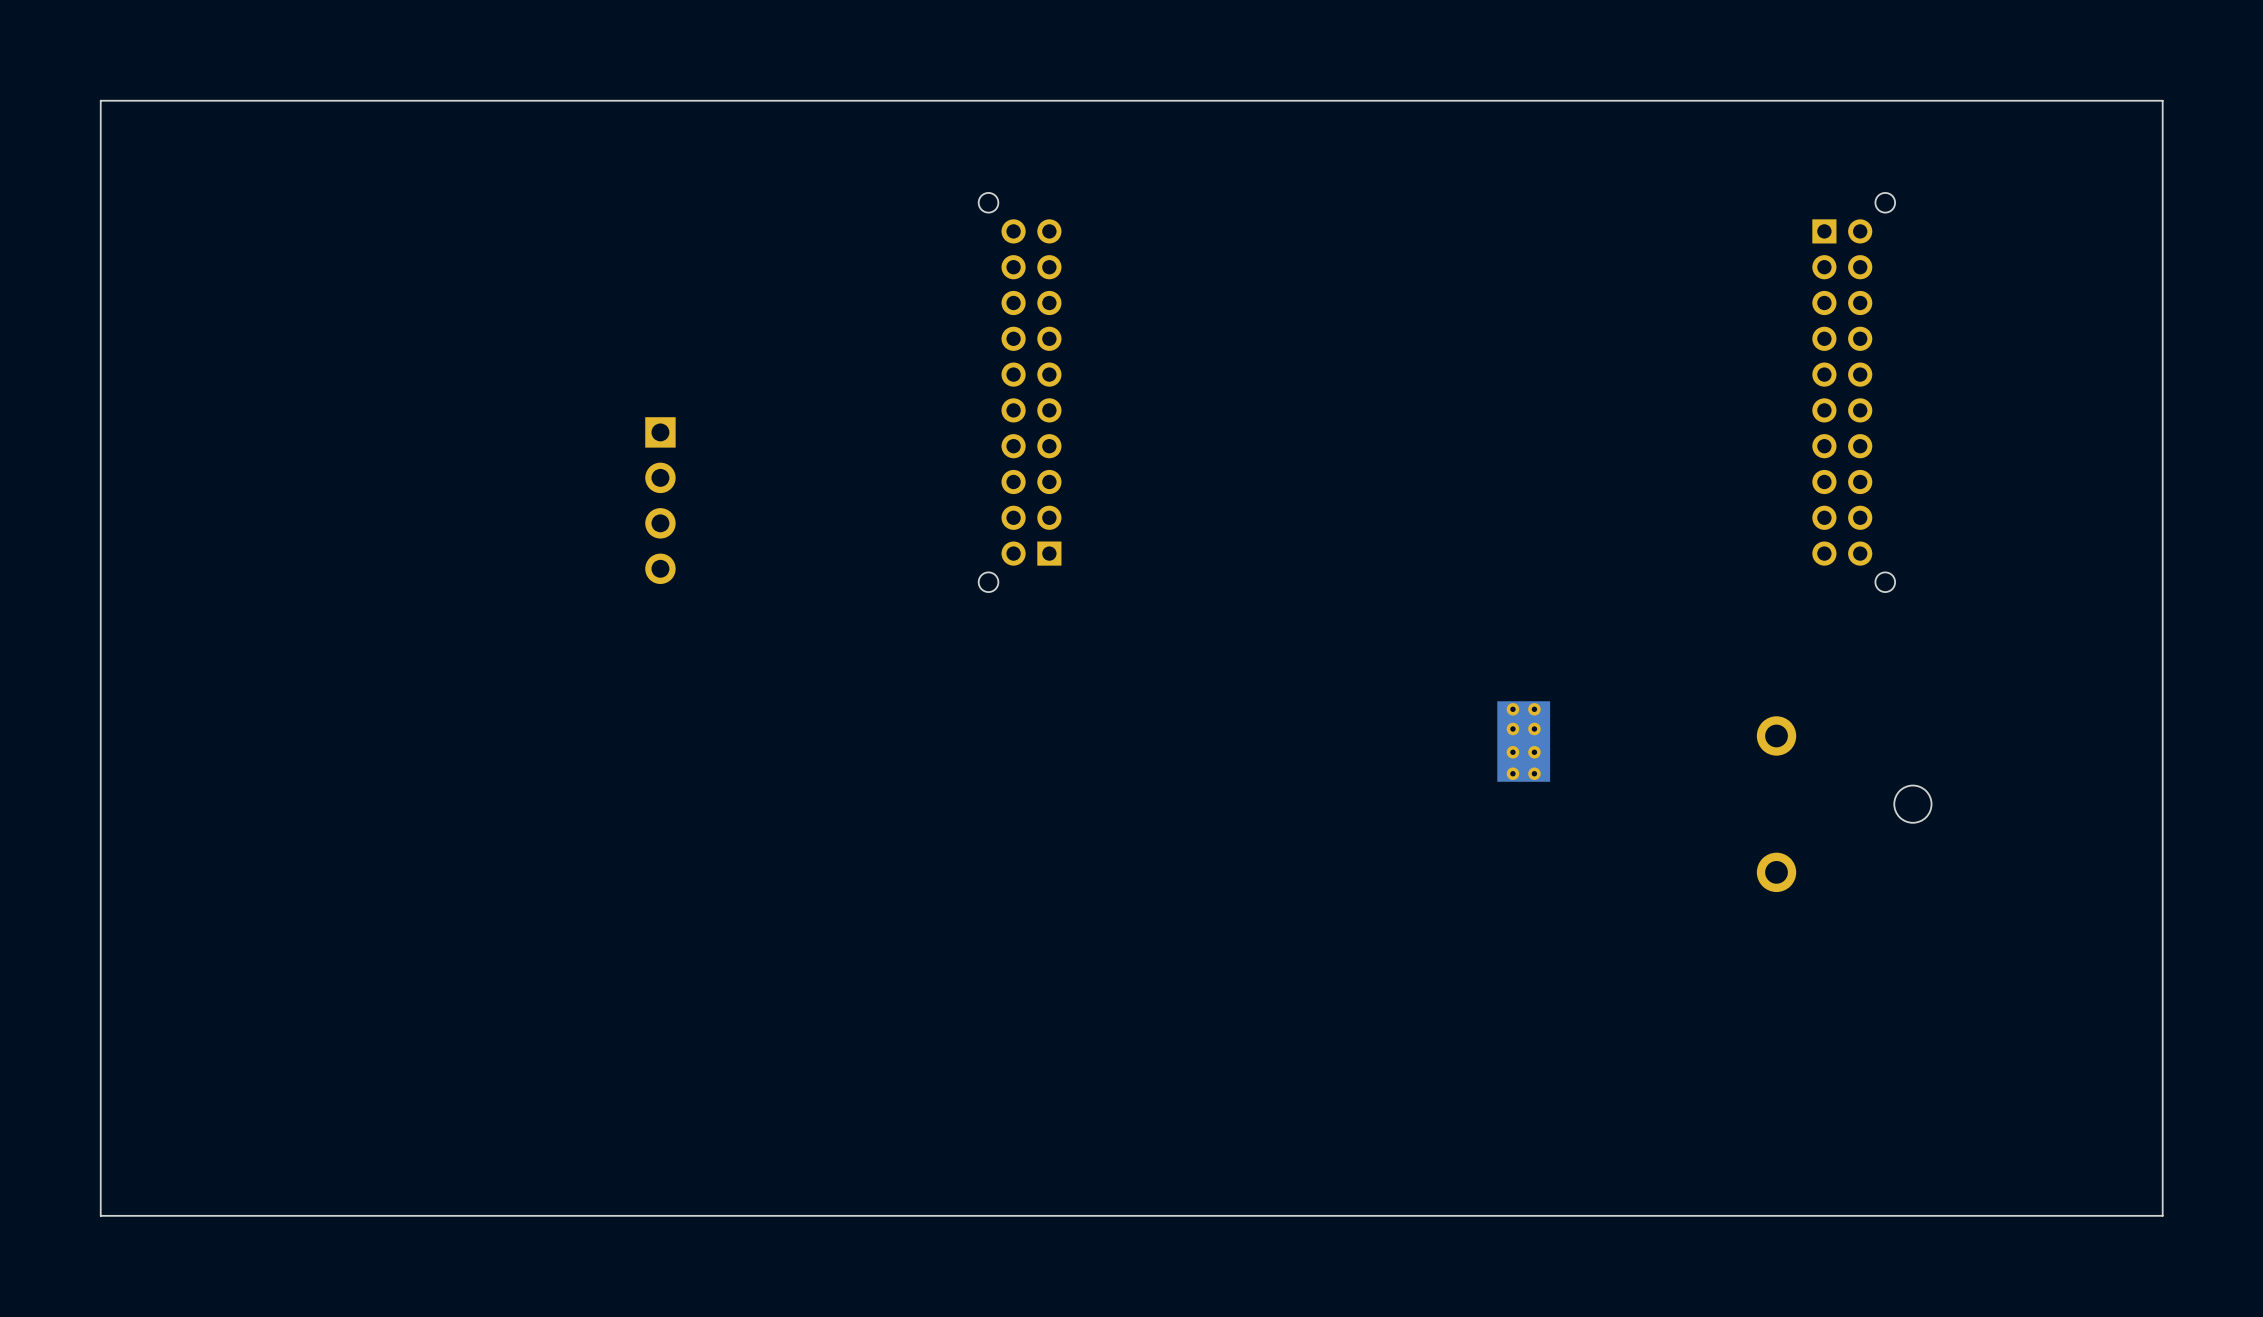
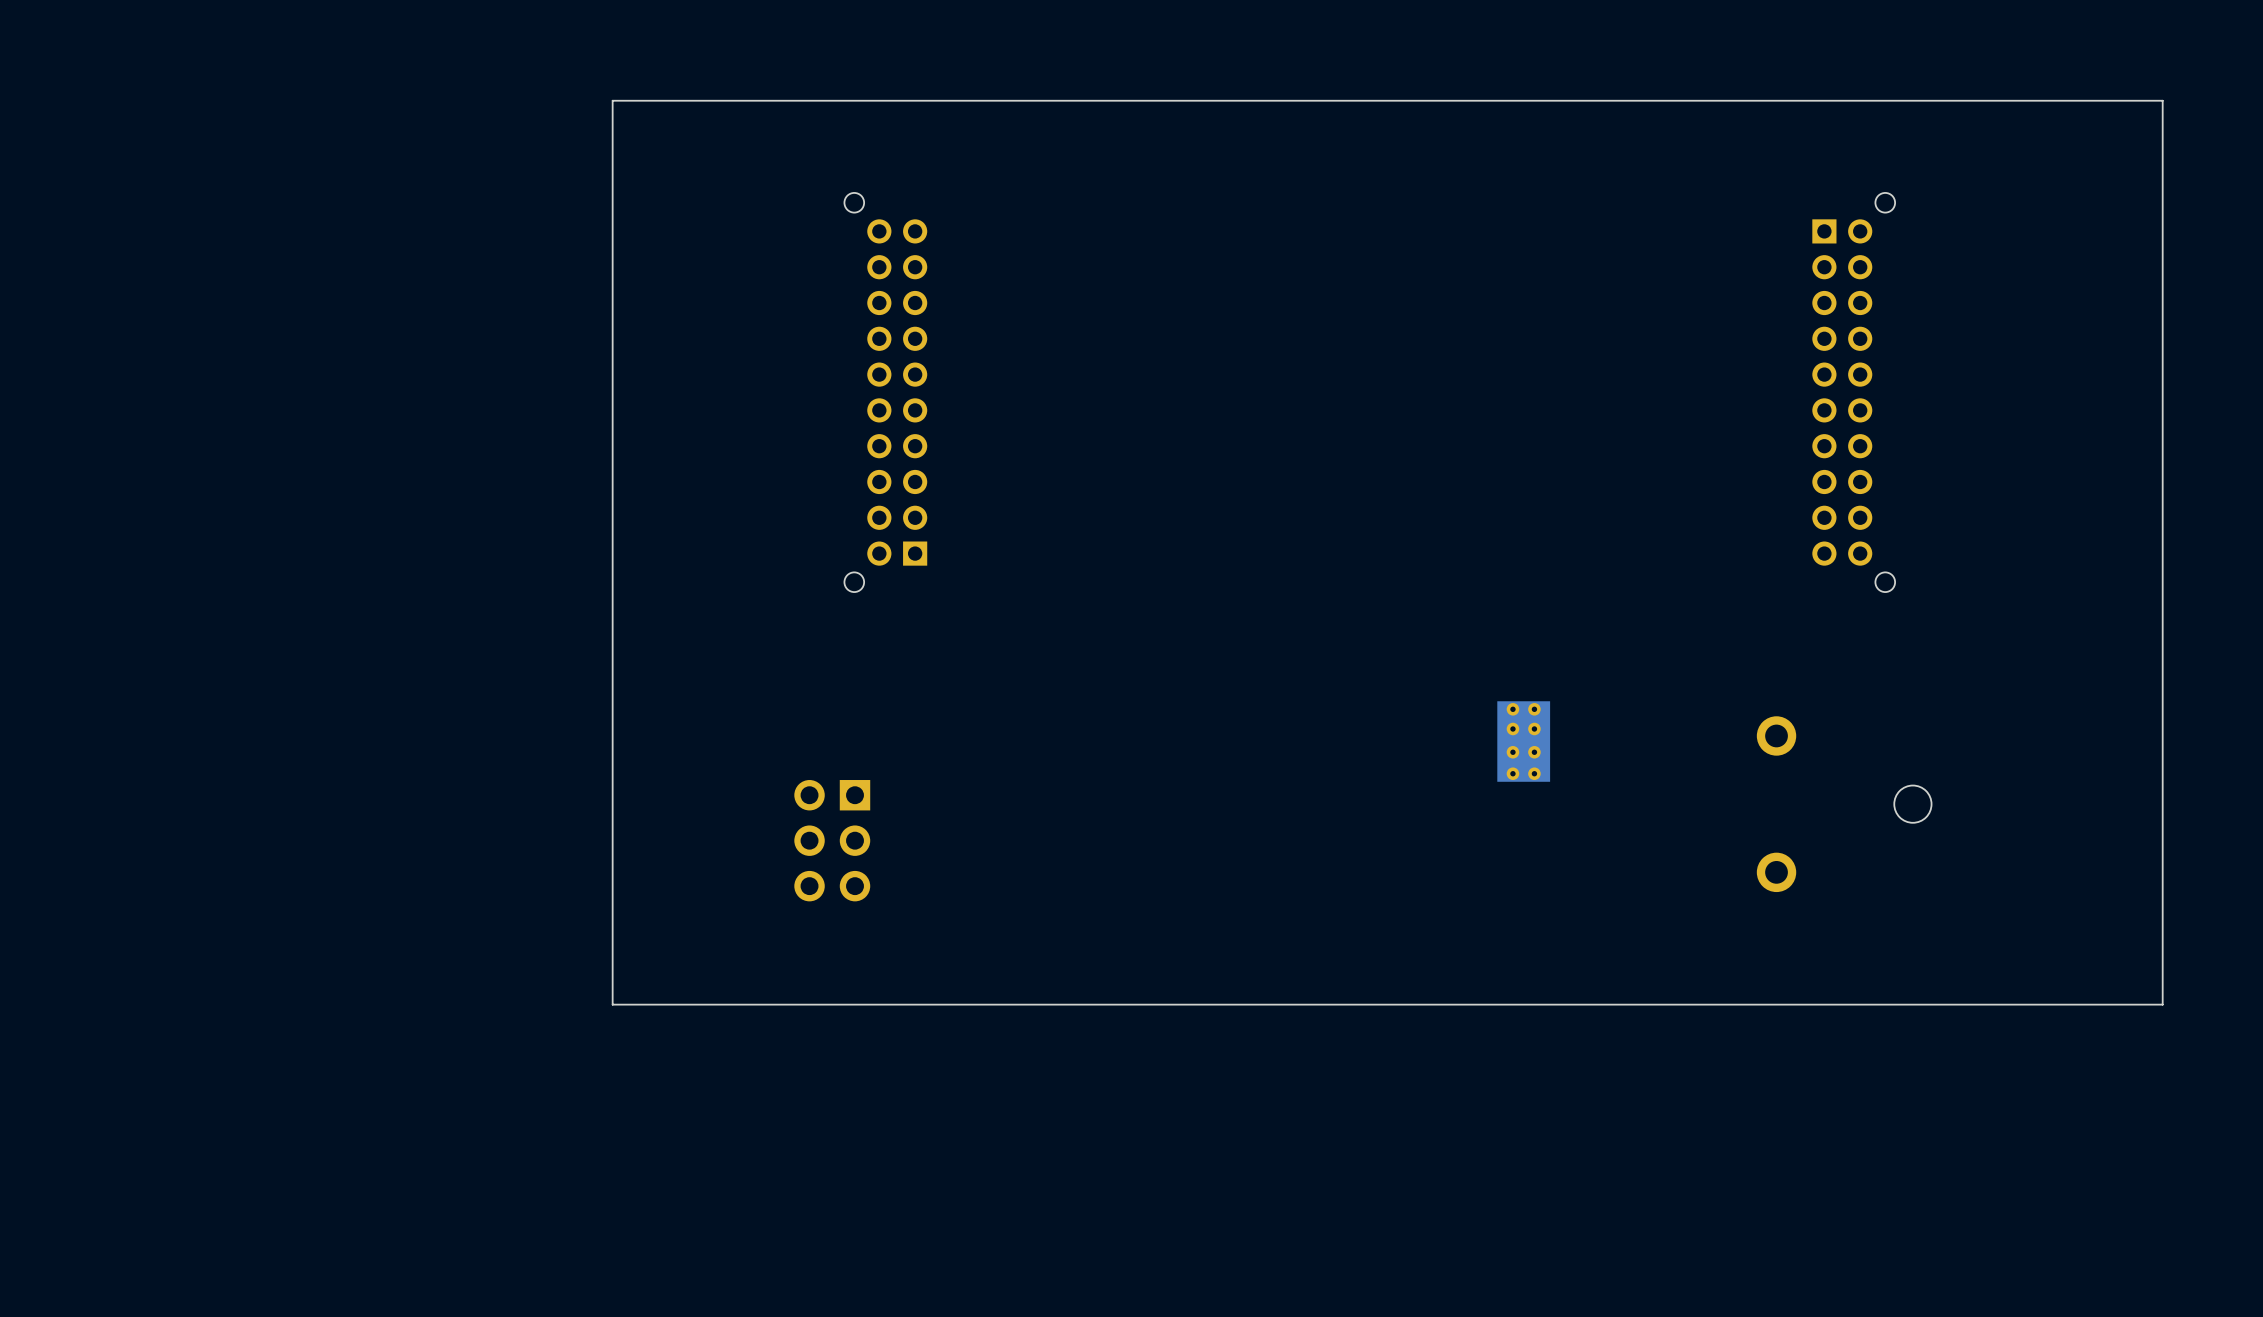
board edge: (612, 100) (100, 100) (100, 1215) (2162, 1215) (2162, 1004) -> (612, 100) (612, 1004) (2162, 1004)
part position: (1020, 392) -> (885, 392)
part: (660, 500) -> none
part: none -> (832, 840)

